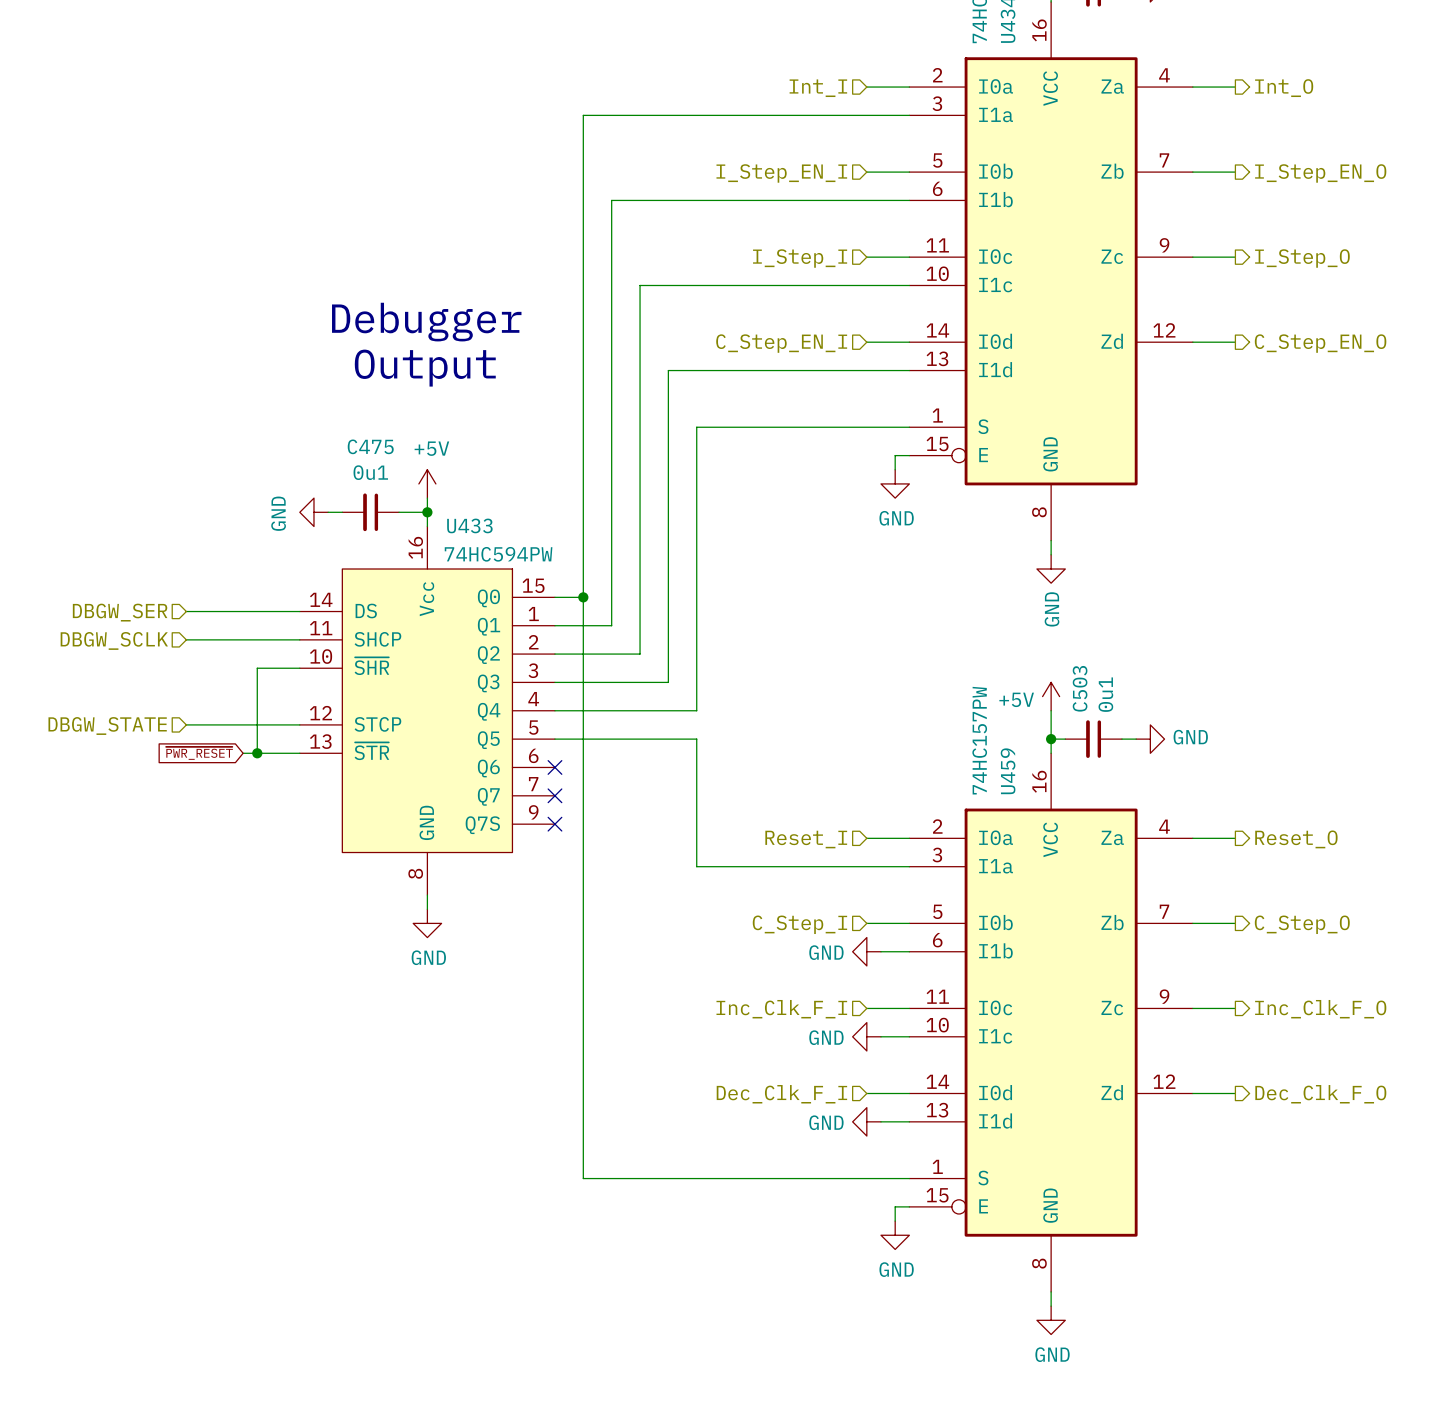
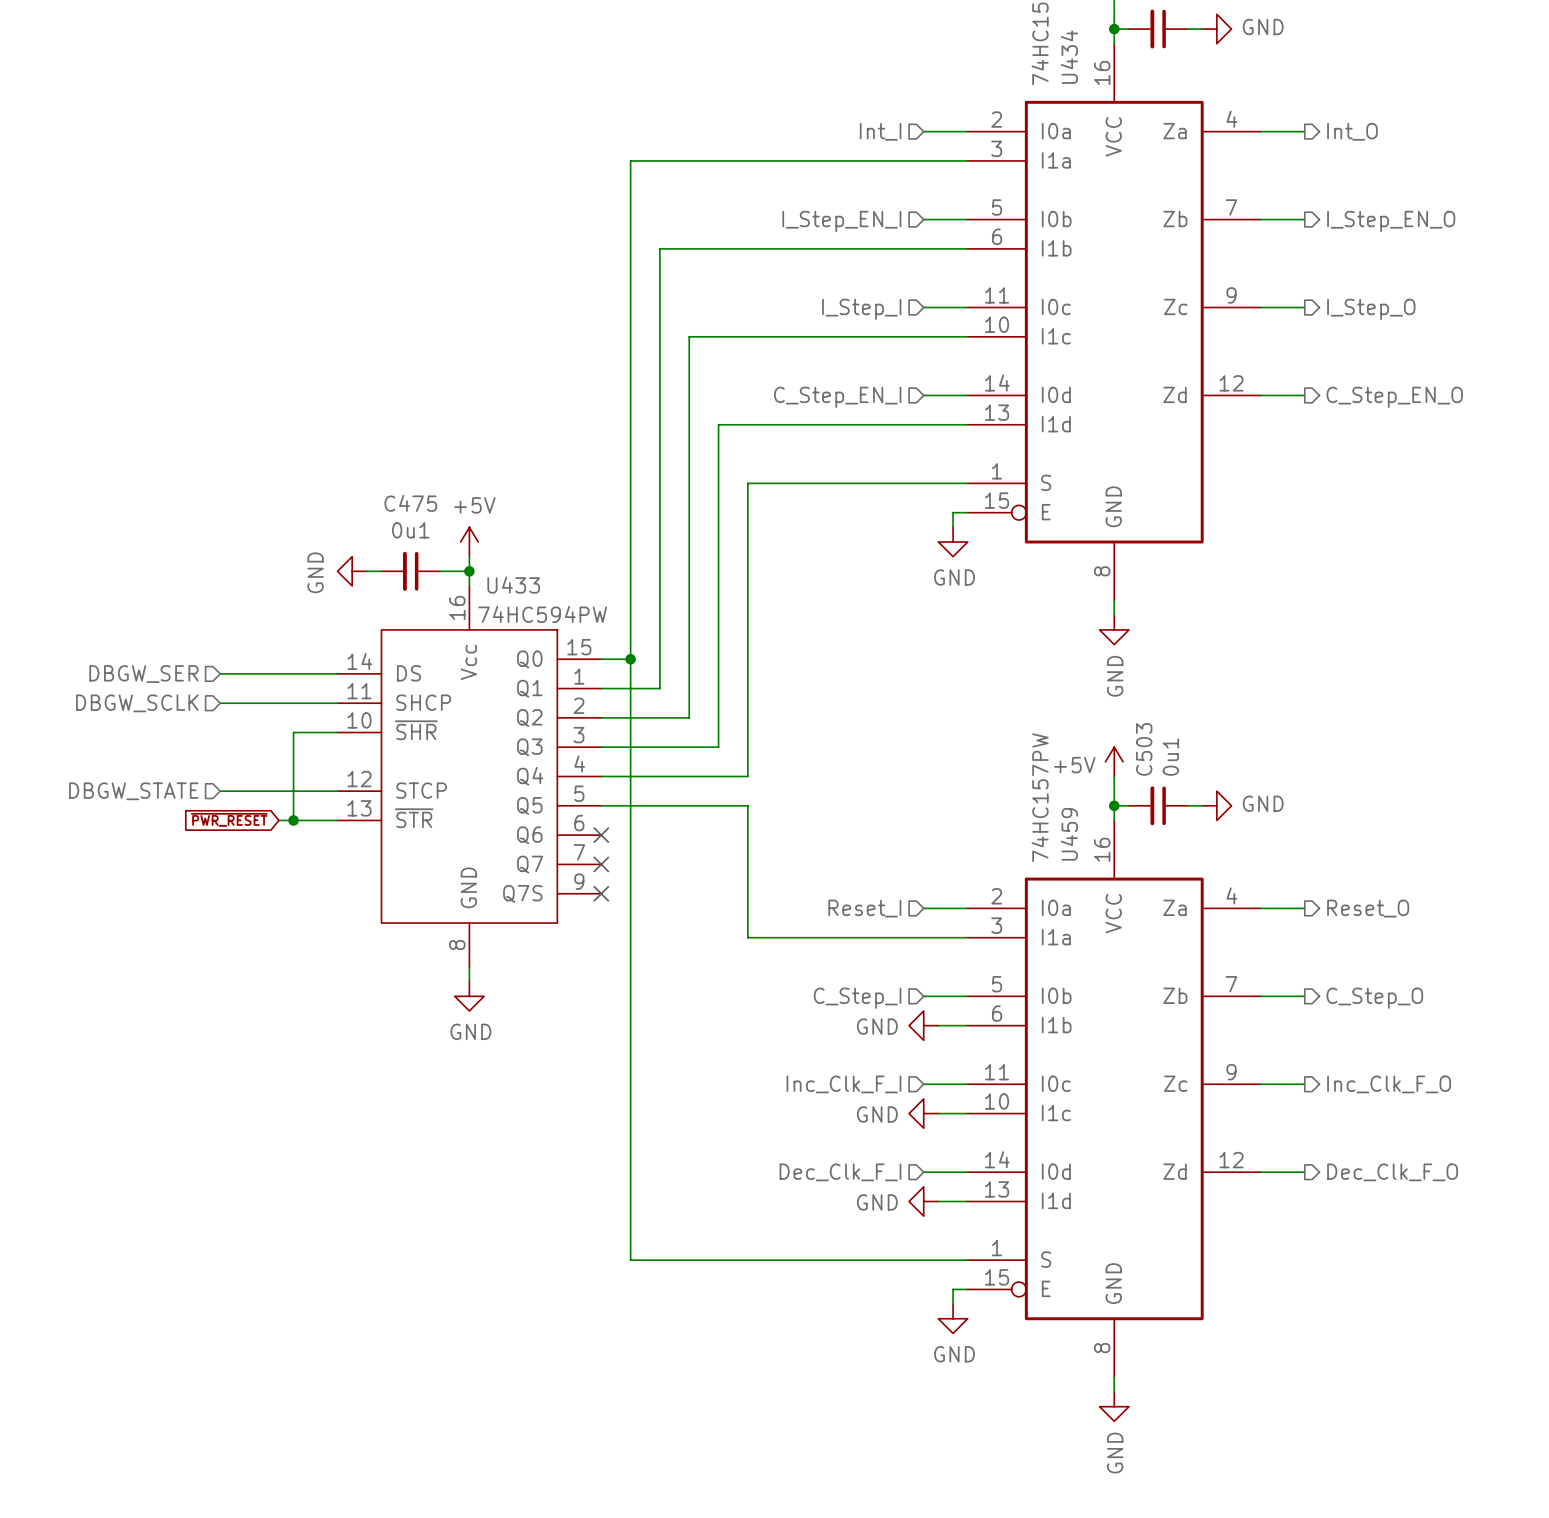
text: Debugger (426, 322) -> none
text: Output (425, 368) -> none
power symbol text rotation: 0° (1052, 1354) -> 90° counterclockwise (1115, 1453)

